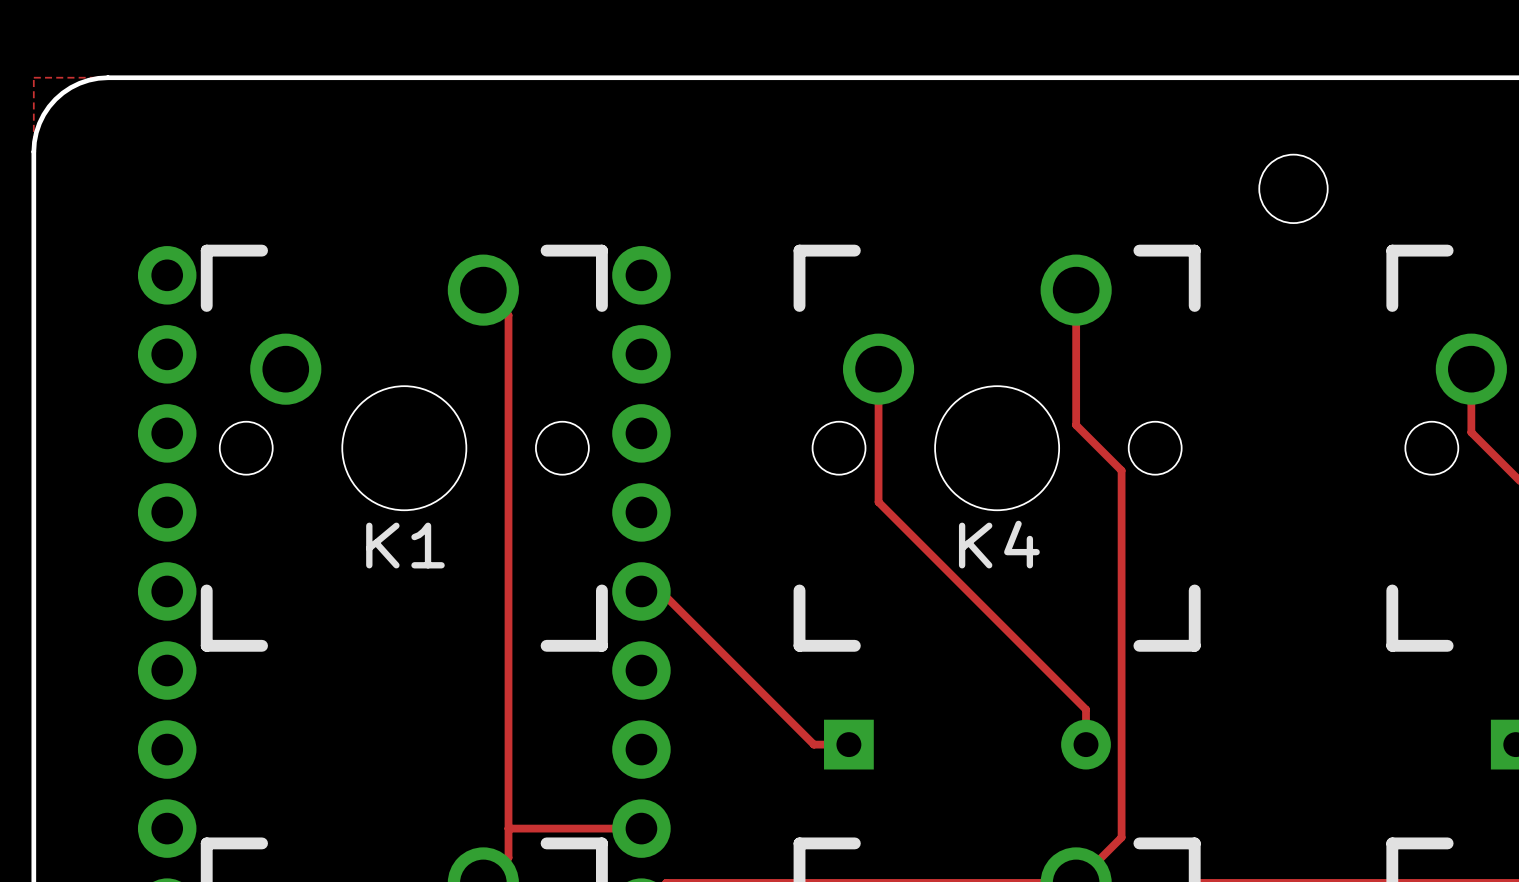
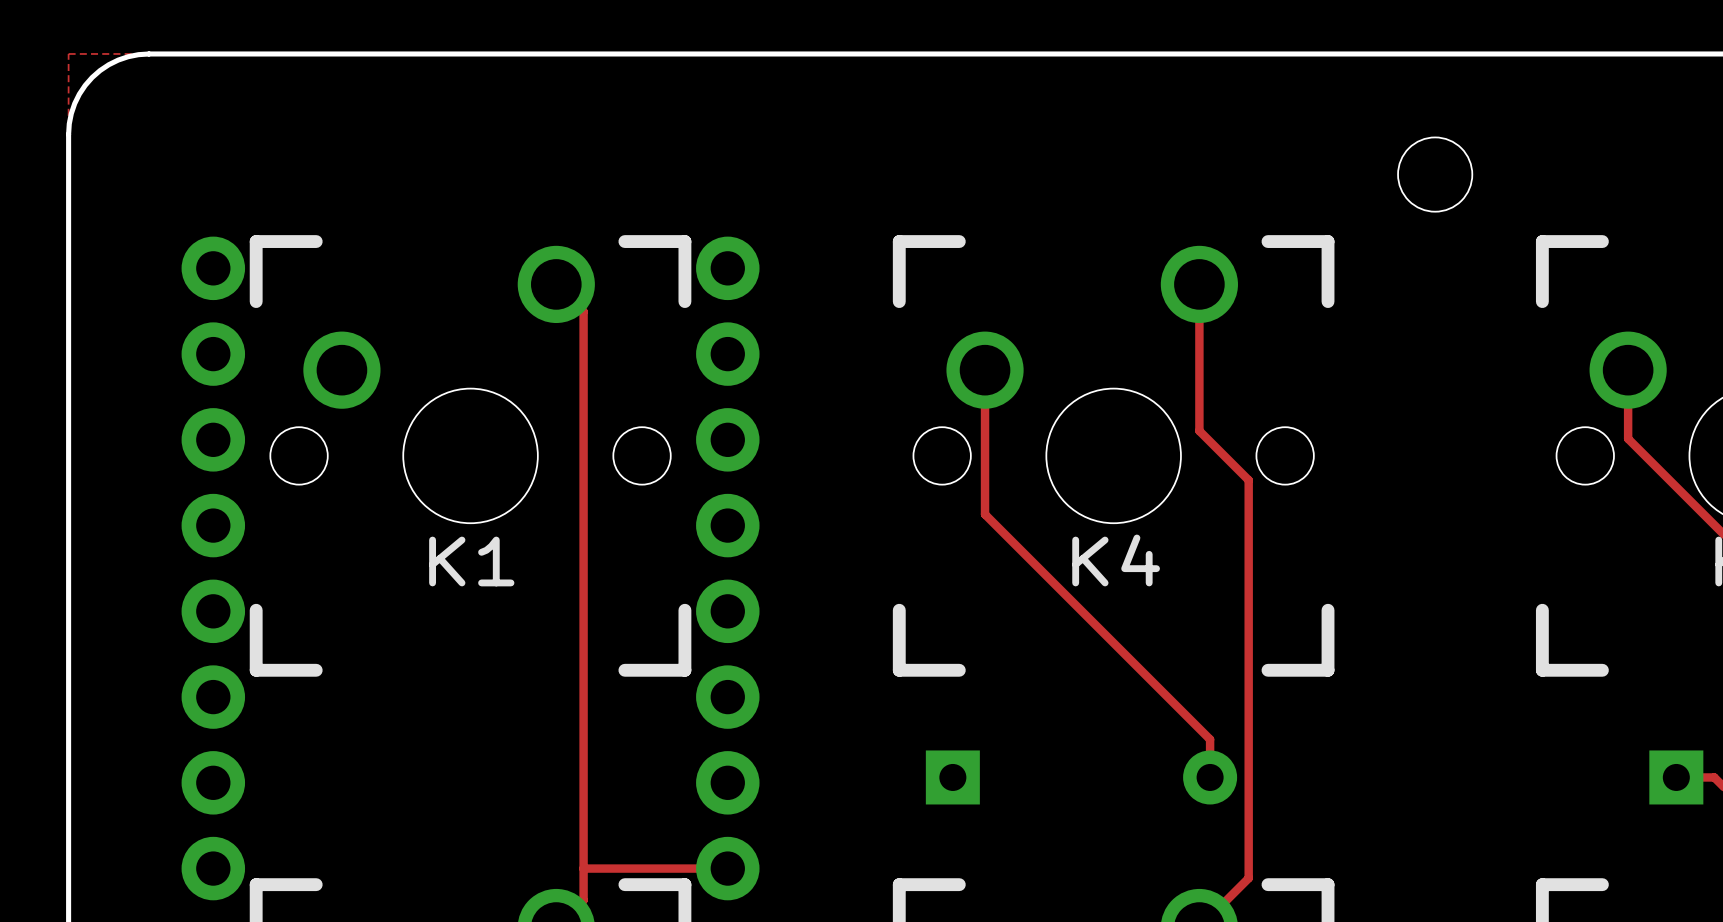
track: (641, 591) (660, 591) (813, 744) (848, 744) -> none

